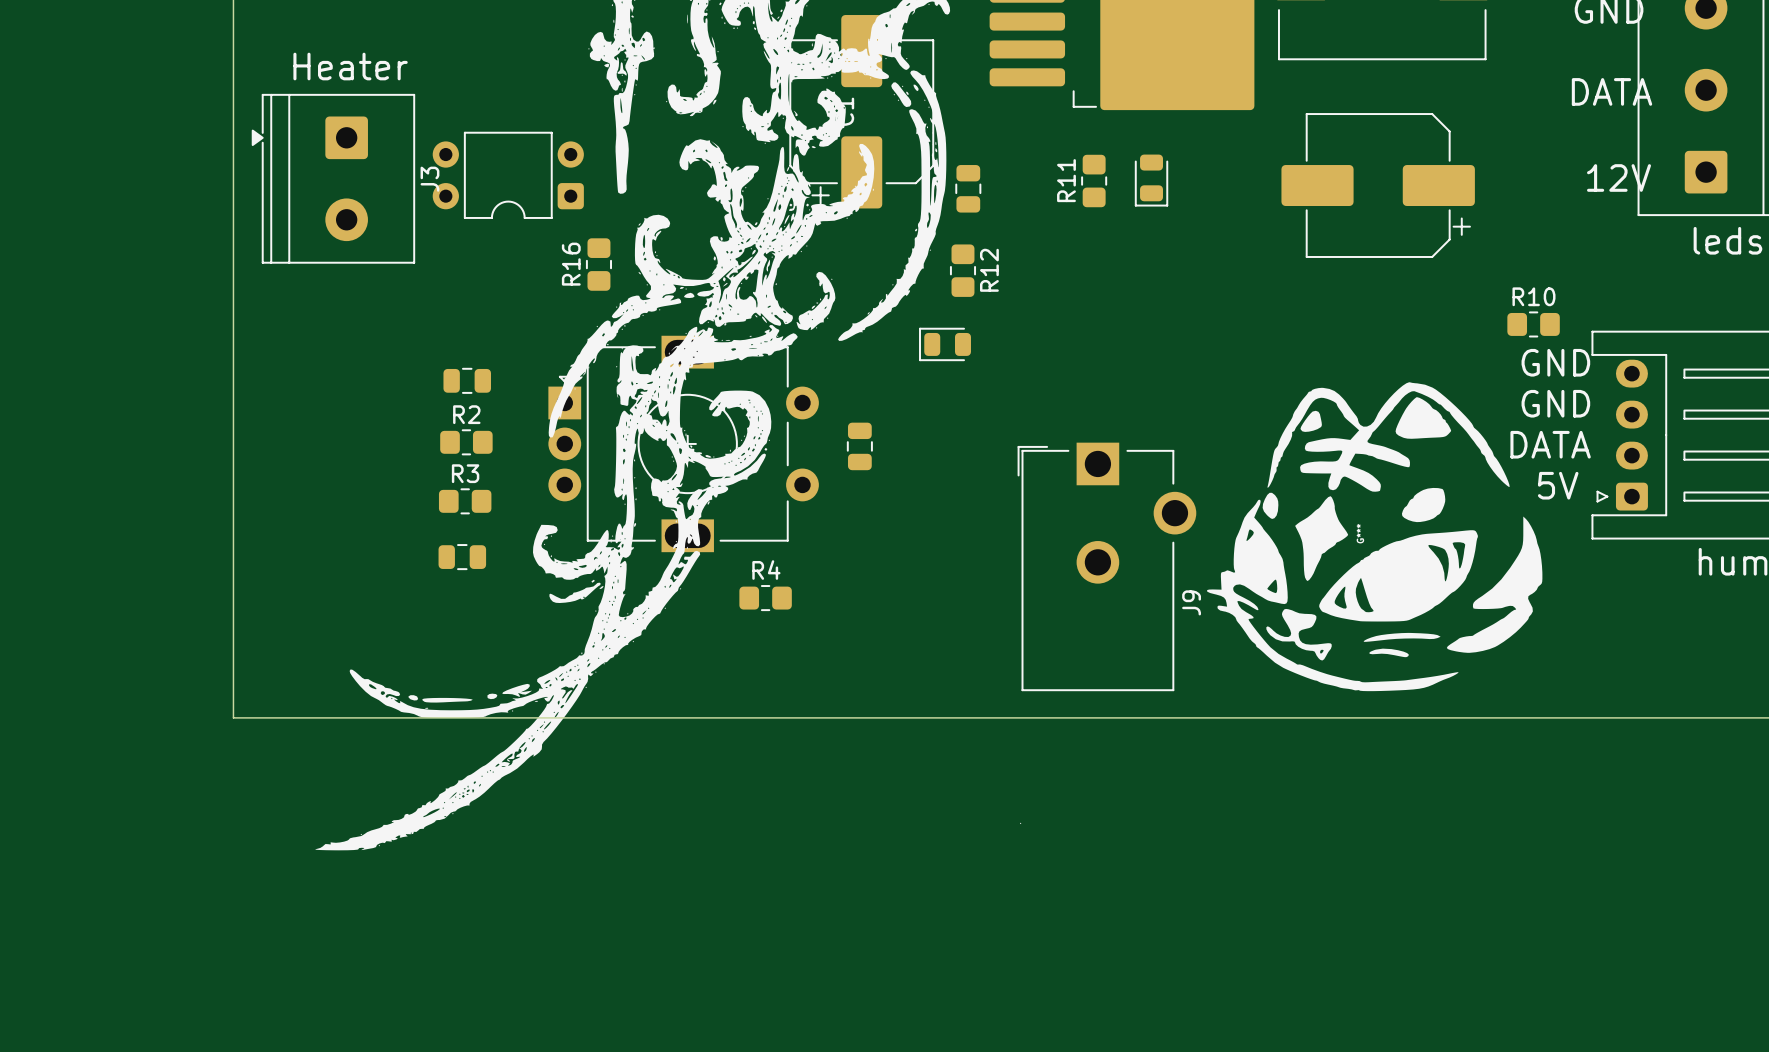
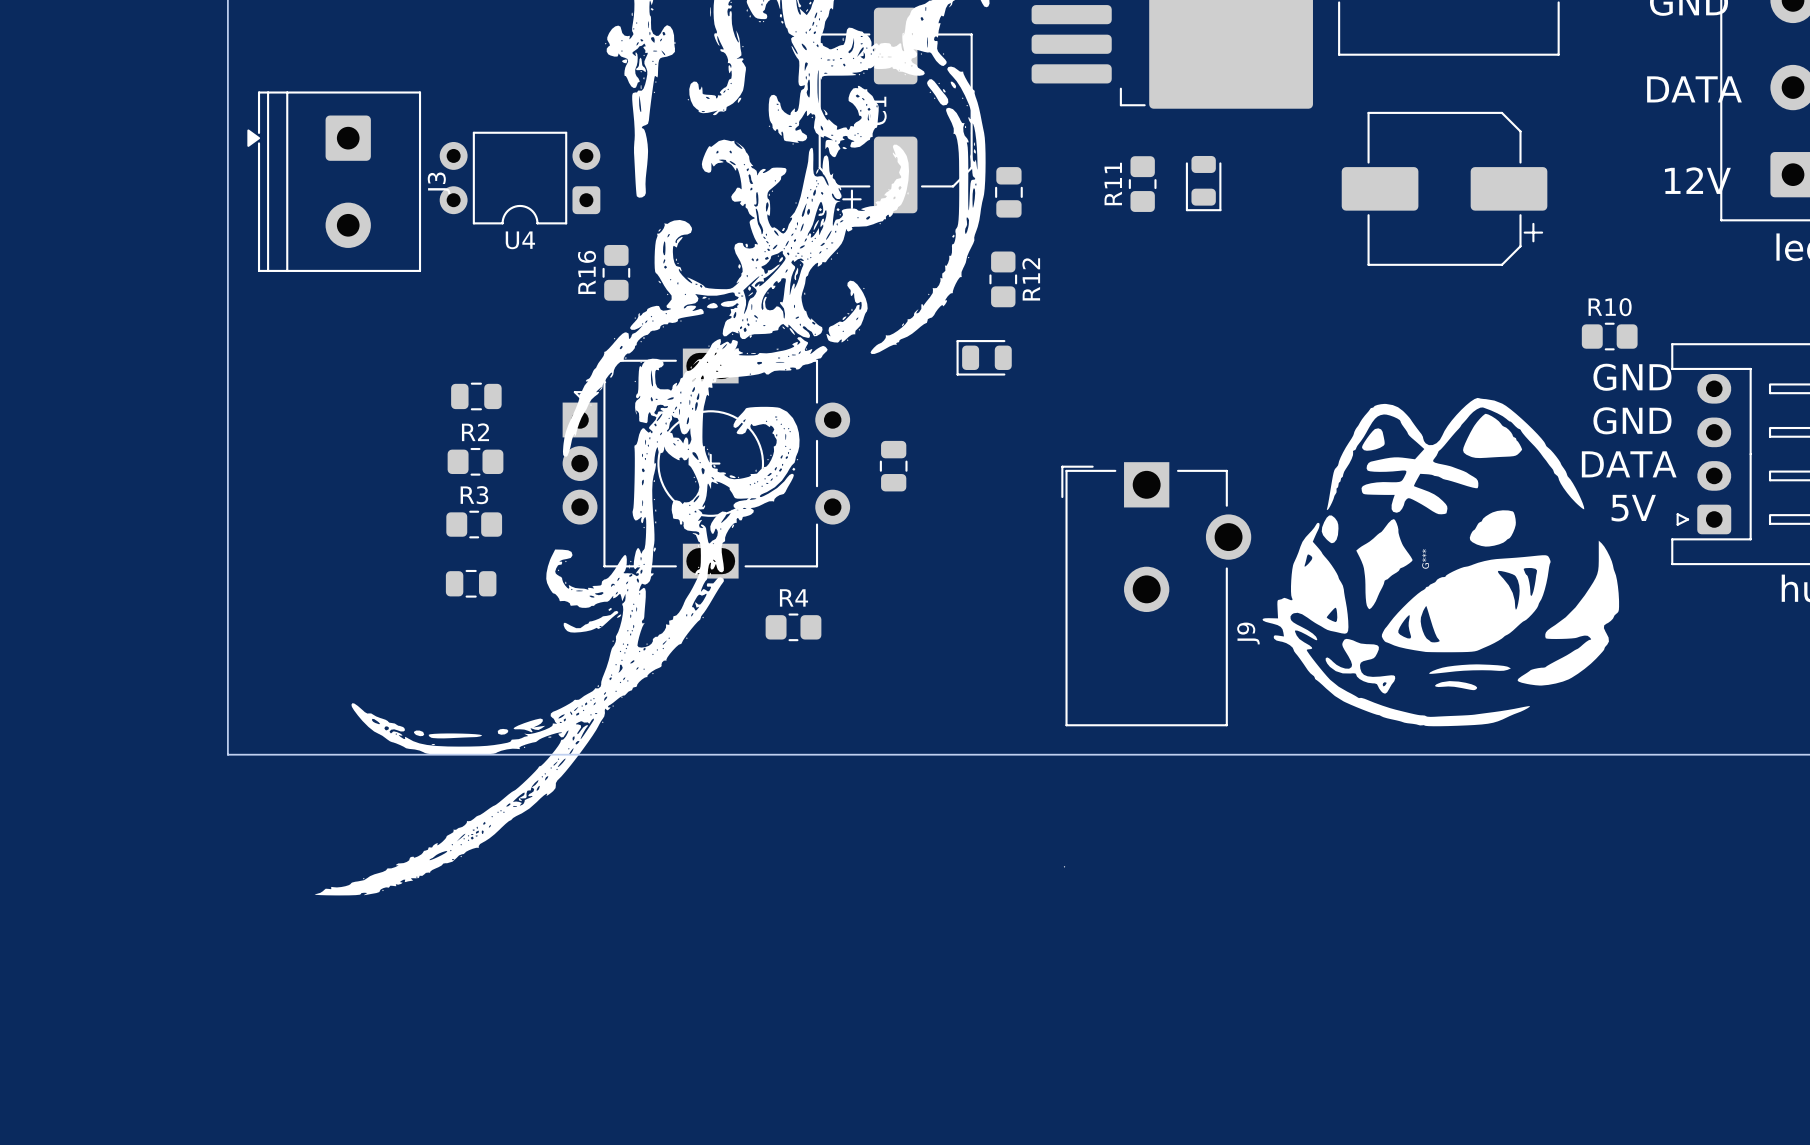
text: Heater (350, 66) -> none
U4 name: none -> U4 (520, 240)

